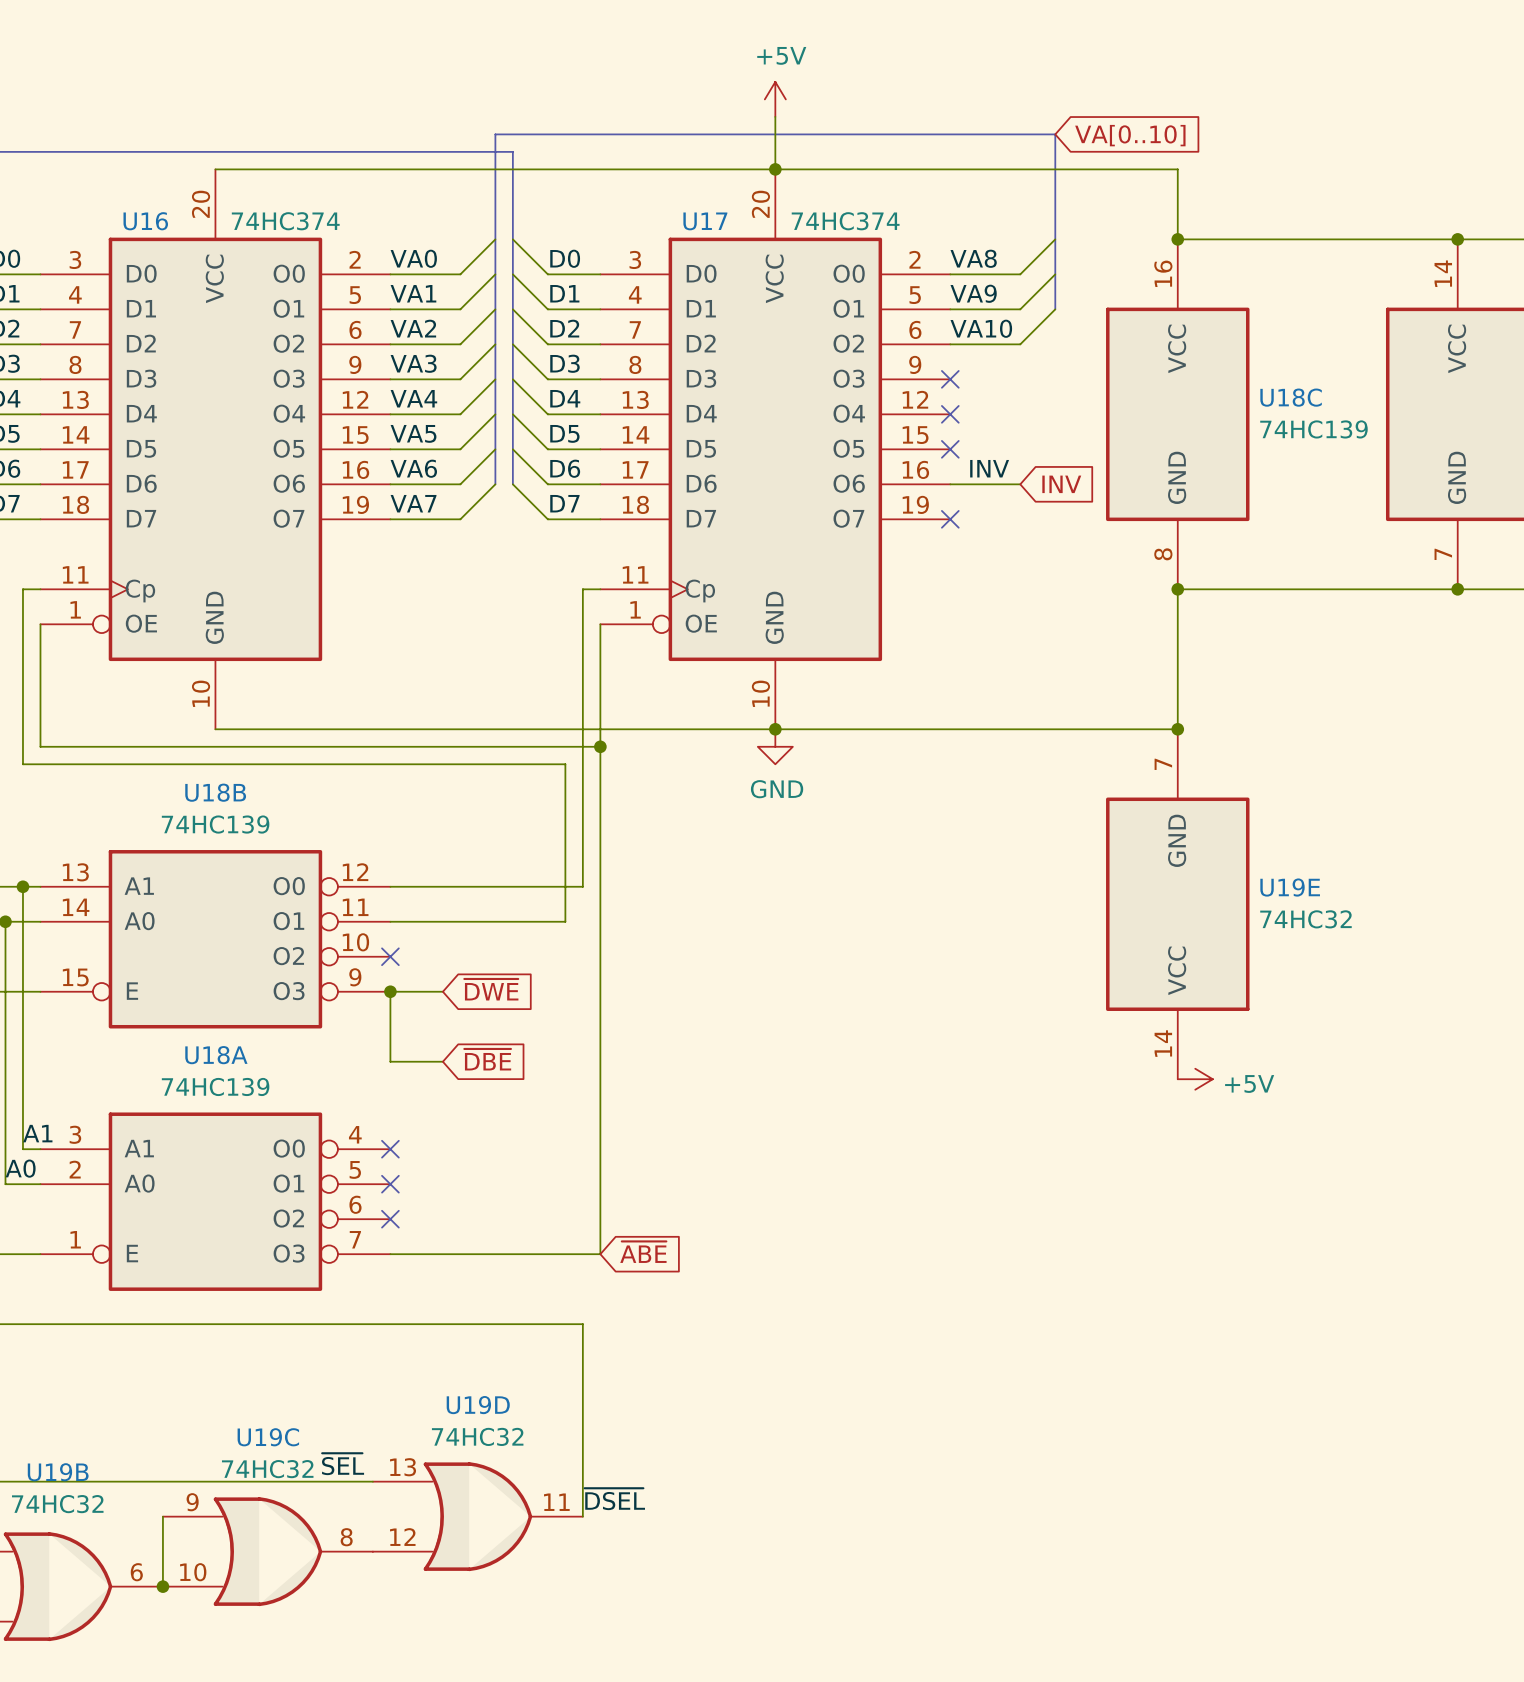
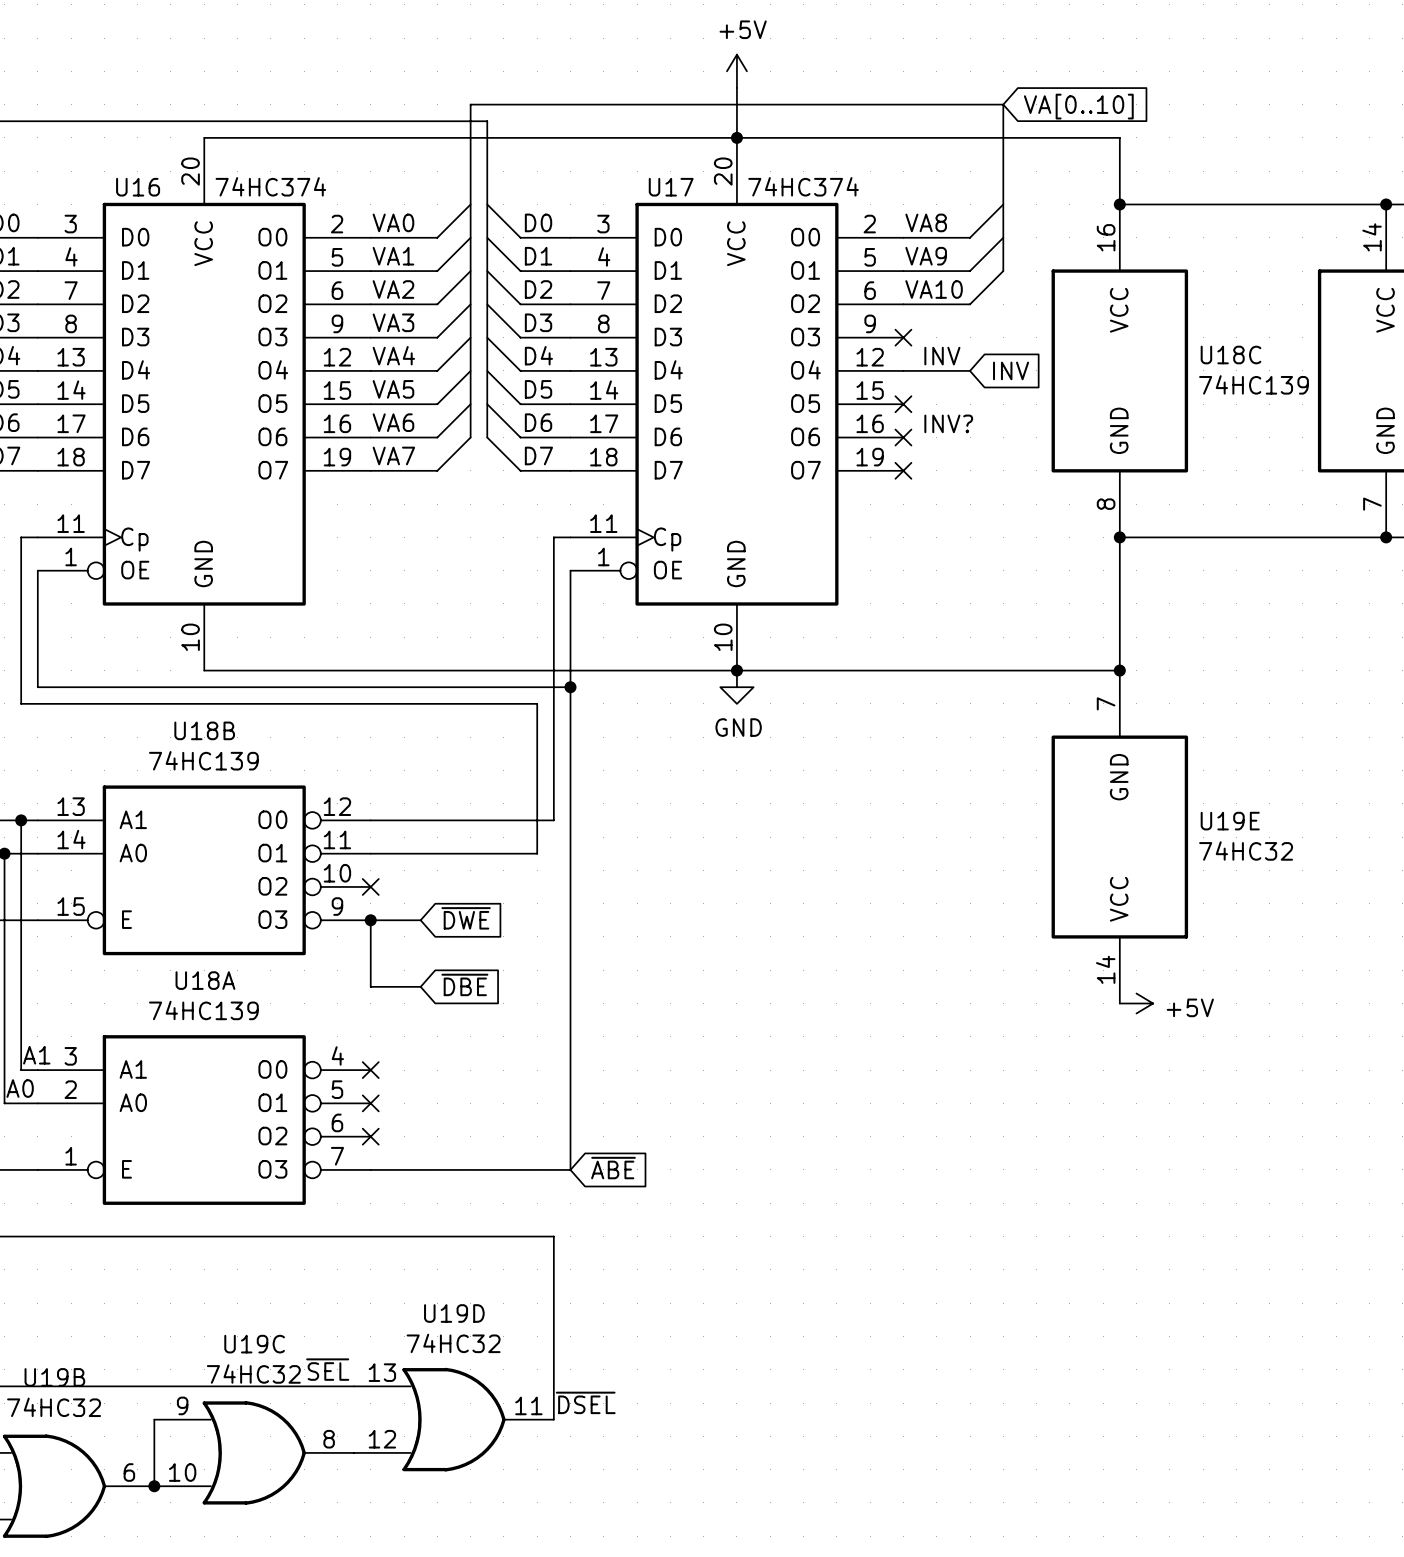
no-connect mark position: (950, 414) -> (903, 437)
label position: INV (989, 468) -> INV (942, 356)
text: none -> INV? (948, 423)
wire: (950, 484) (1020, 484) -> (903, 370) (970, 370)
global label position: INV (1061, 484) -> INV (1011, 370)

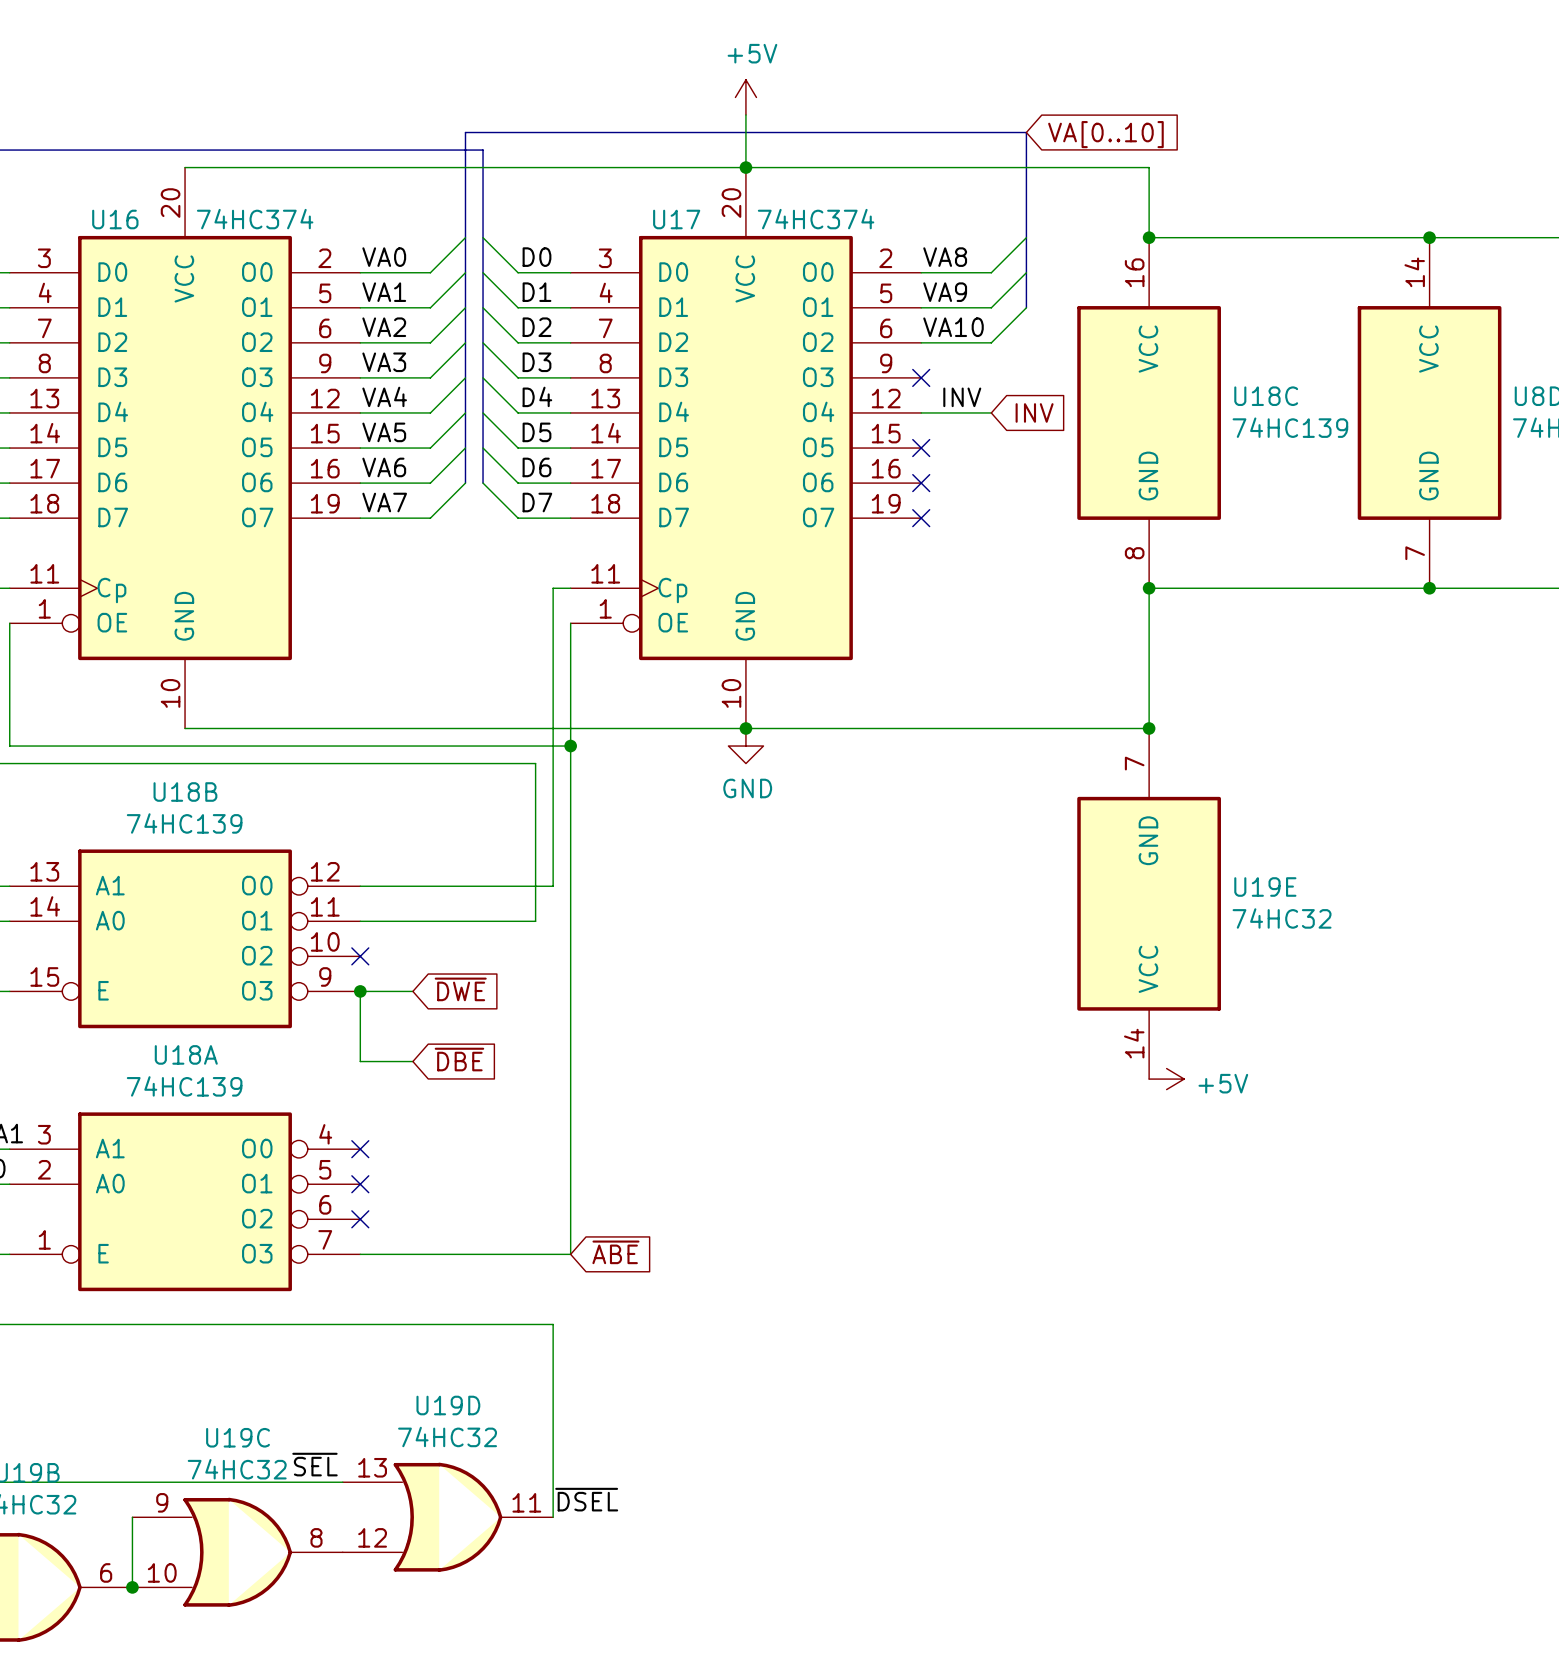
text: INV? (948, 423) -> none

